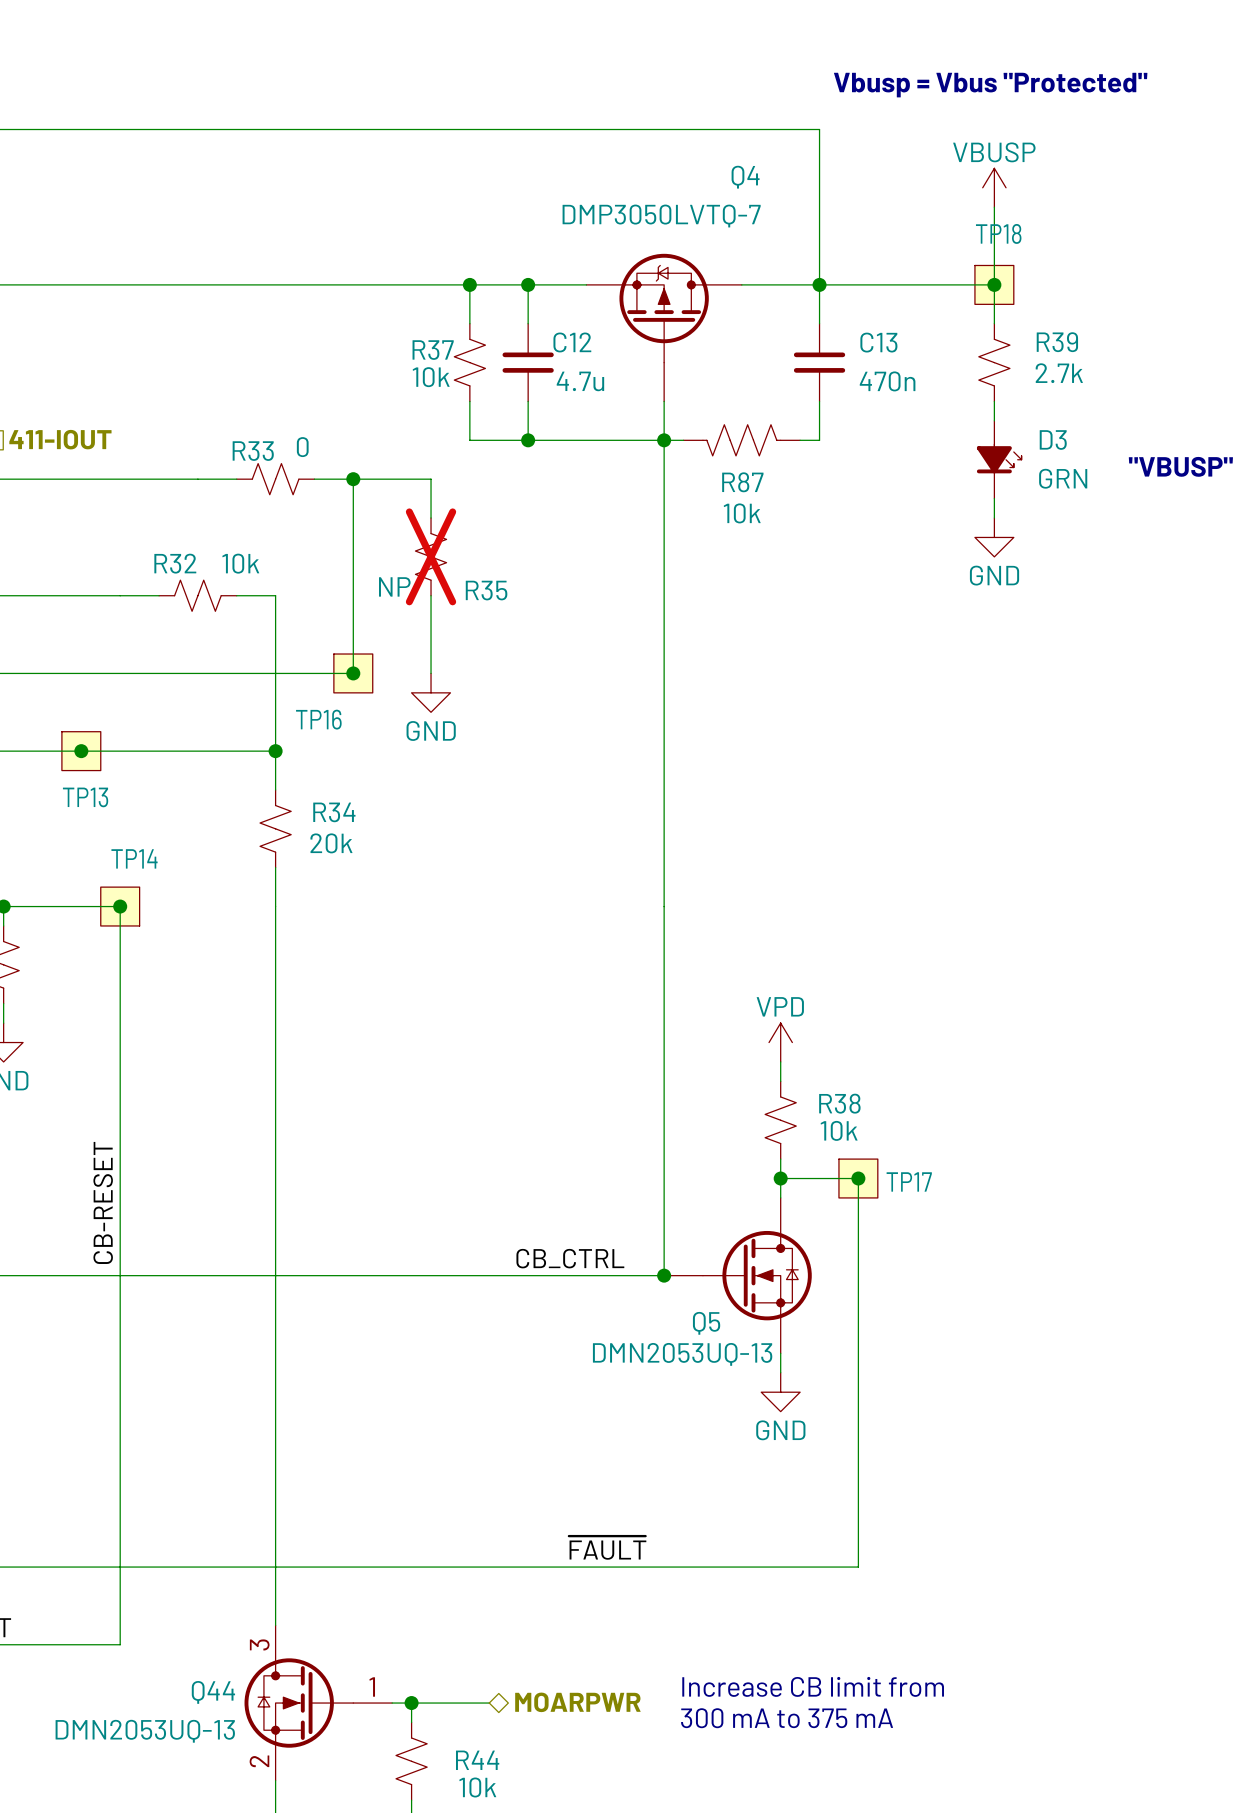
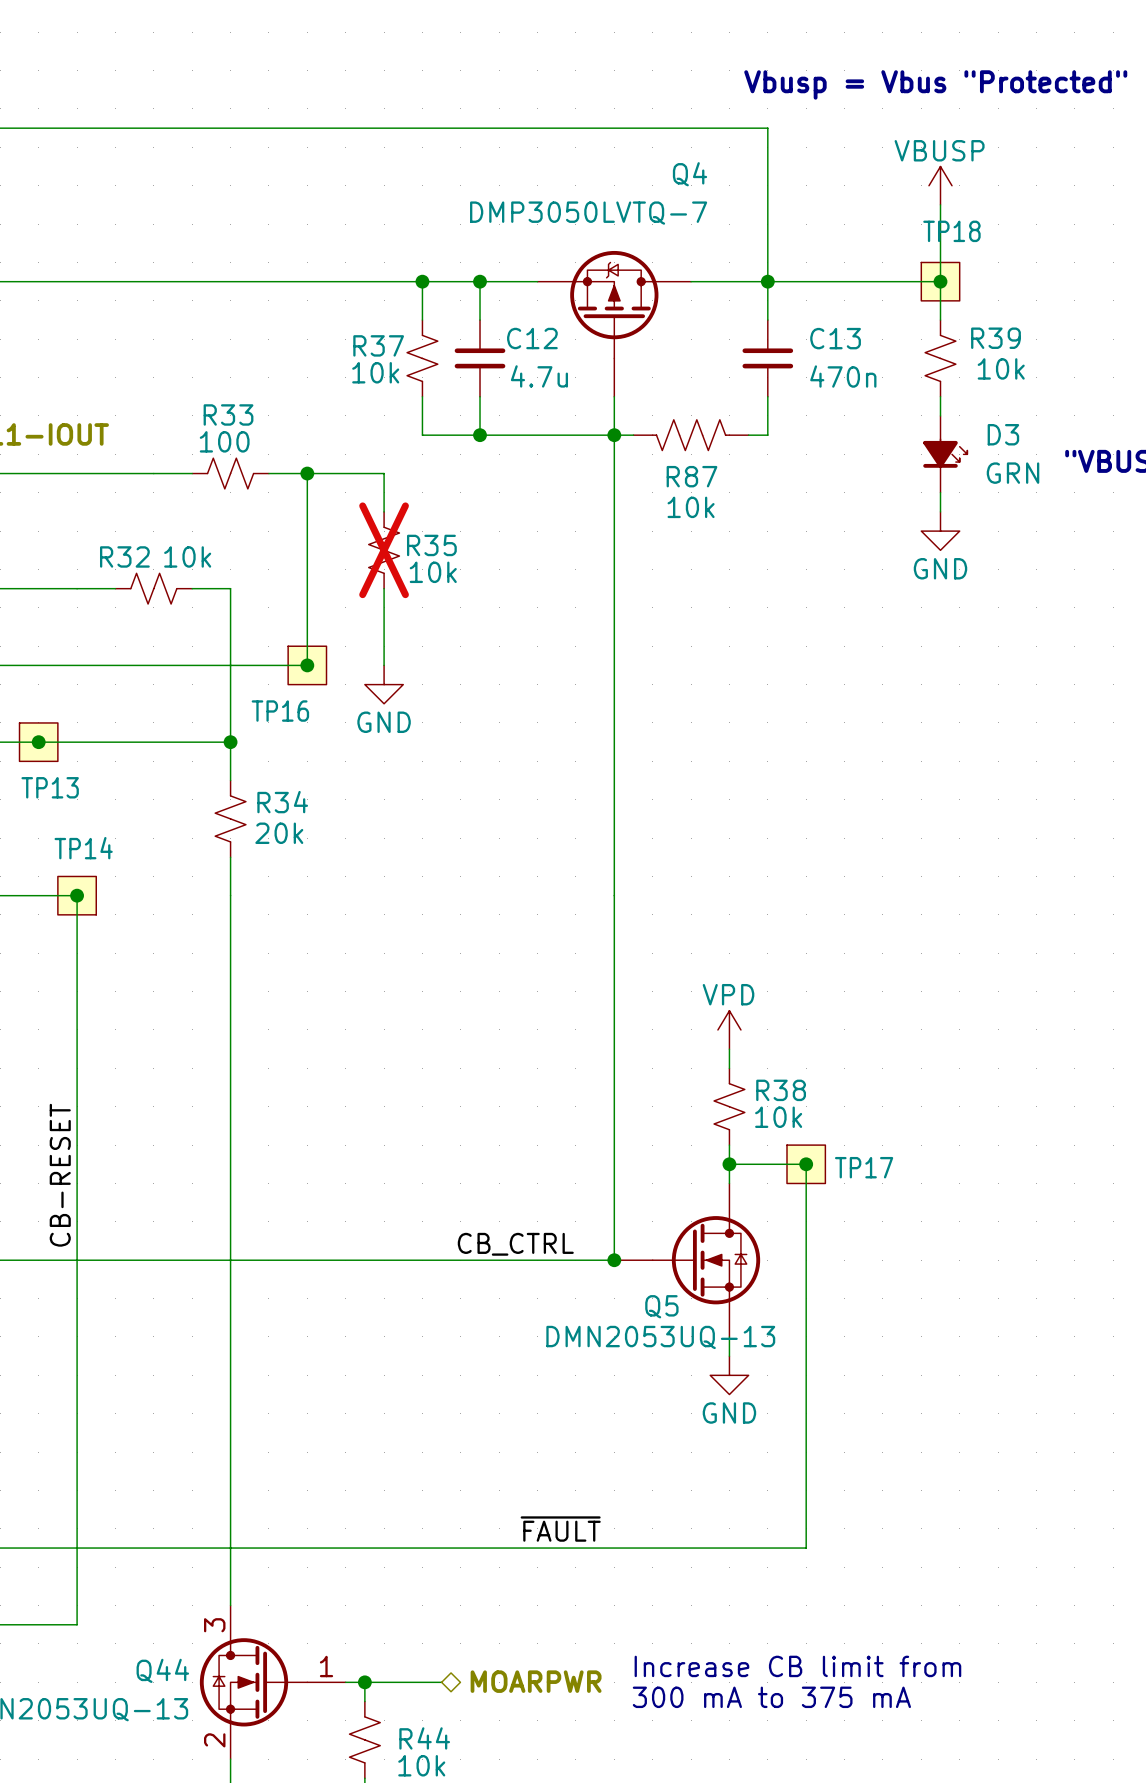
R39 value: 2.7k (1059, 373) -> 10k (1001, 368)
R33 value: 0 (302, 447) -> 100 (224, 441)
R33 name position: R33 (253, 451) -> R33 (228, 414)
R35 value: NP (394, 586) -> 10k (433, 572)
R35 name position: R35 (486, 590) -> R35 (431, 545)

